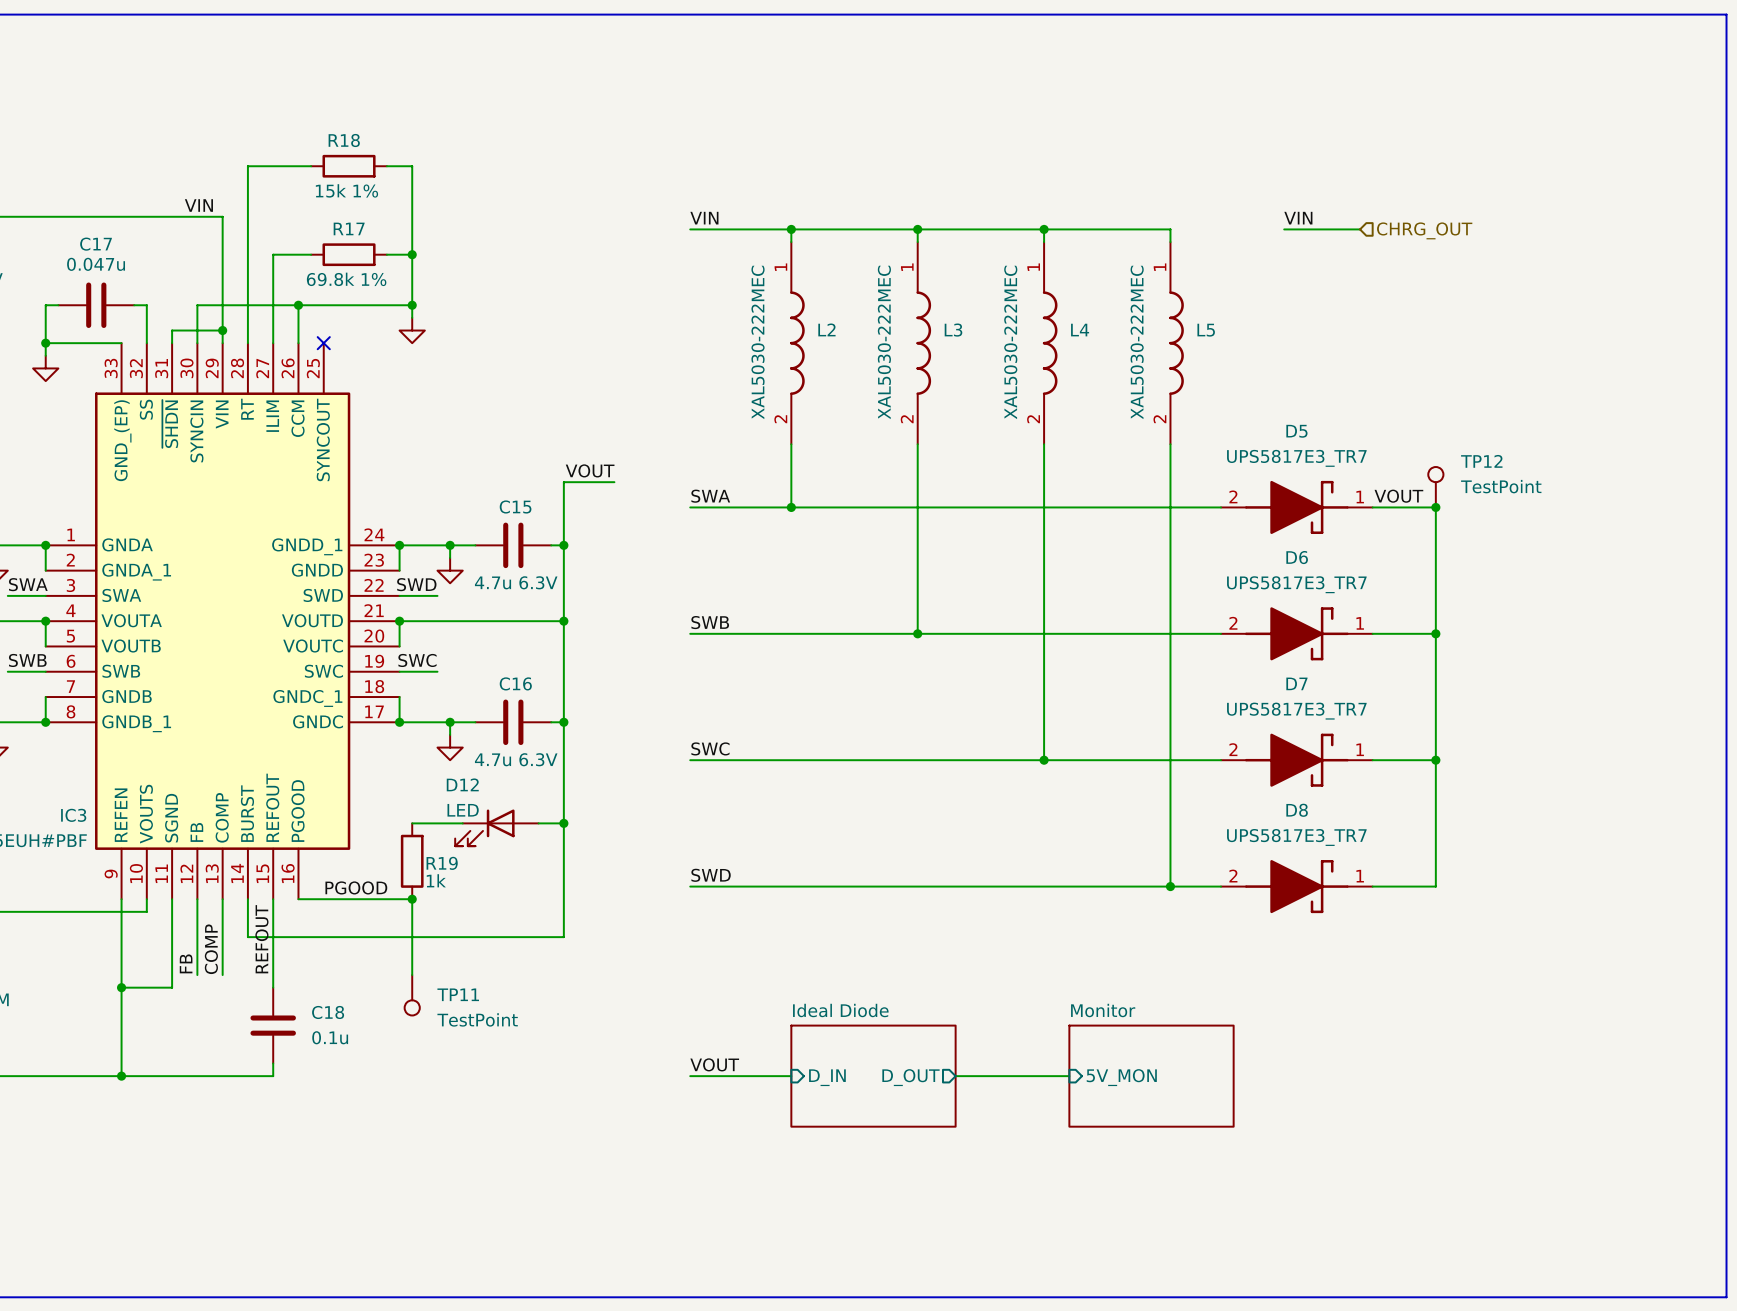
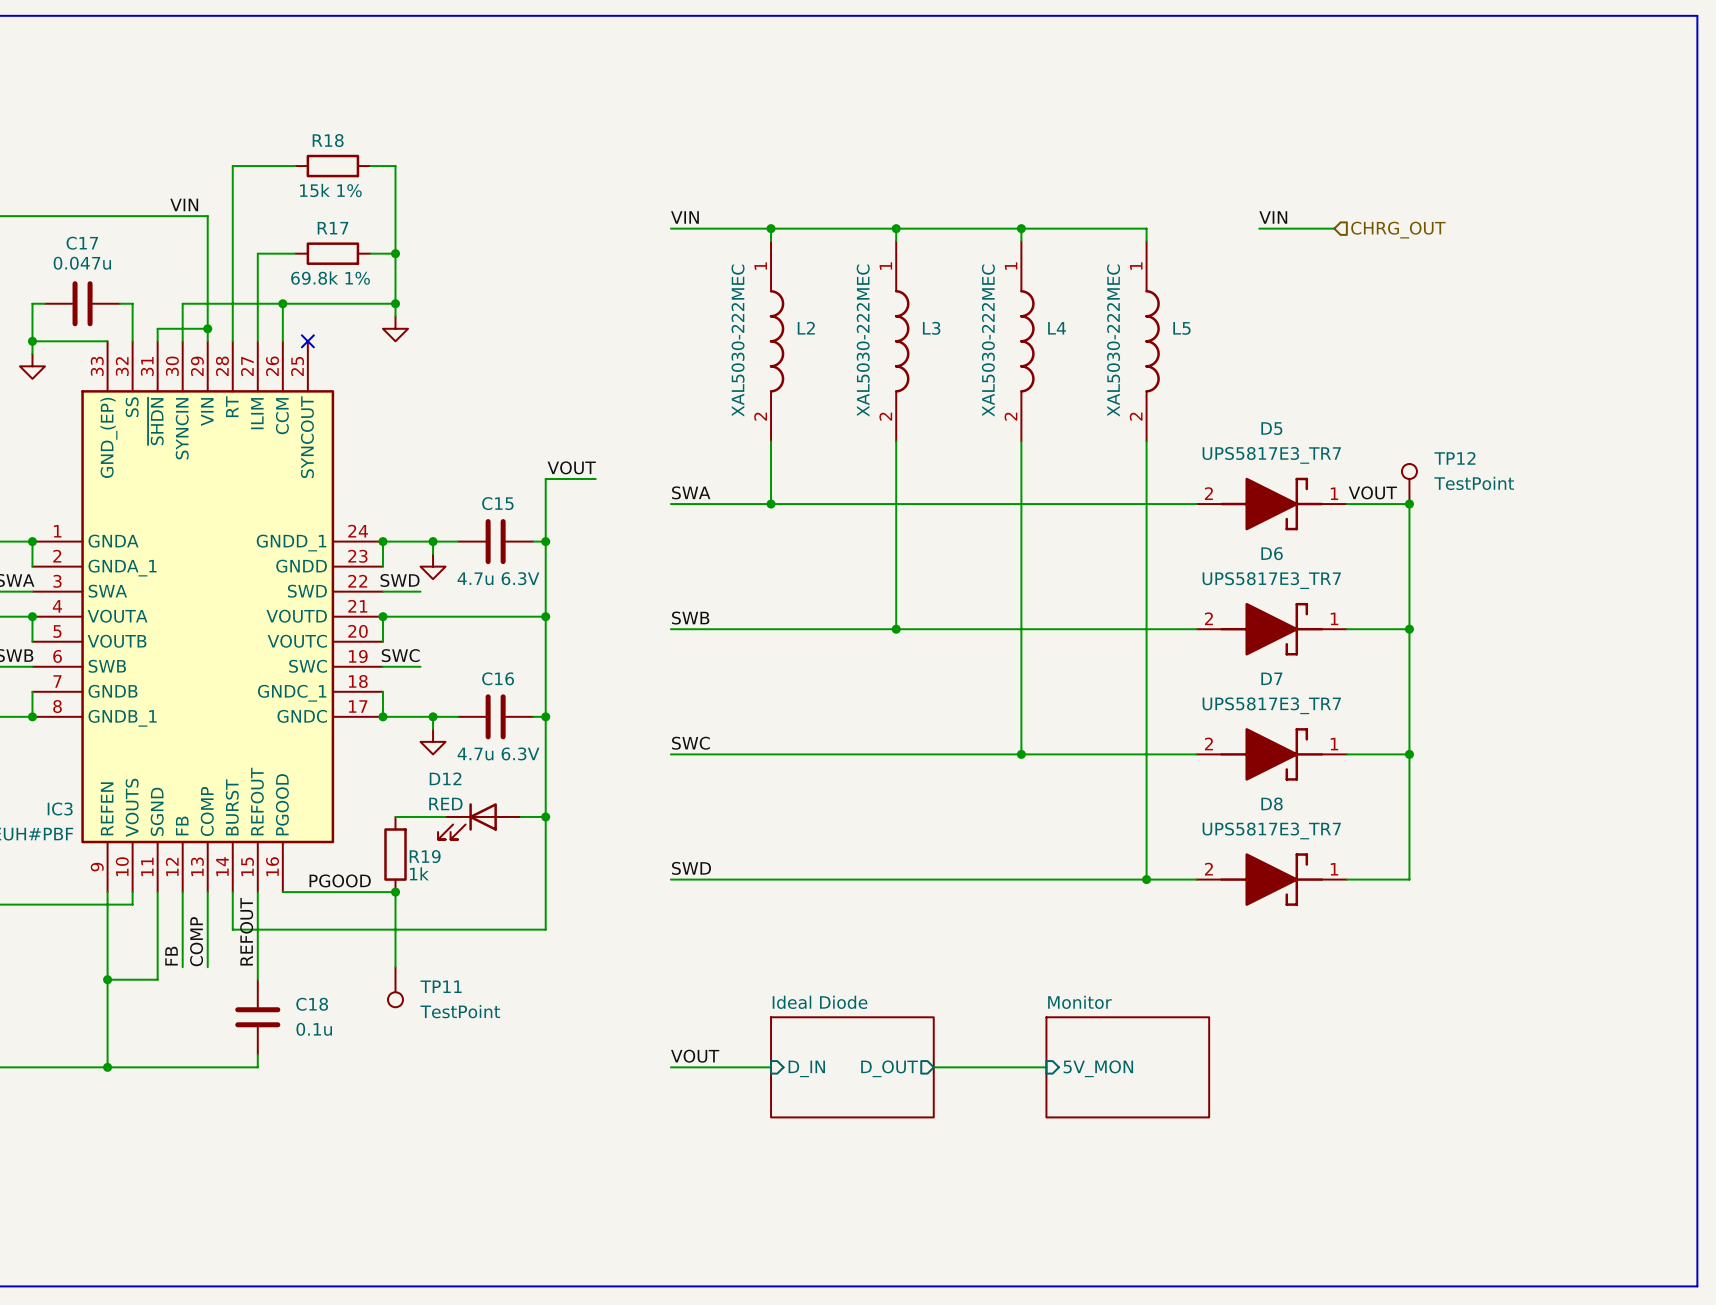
D12 value: LED (463, 810) -> RED (445, 804)

